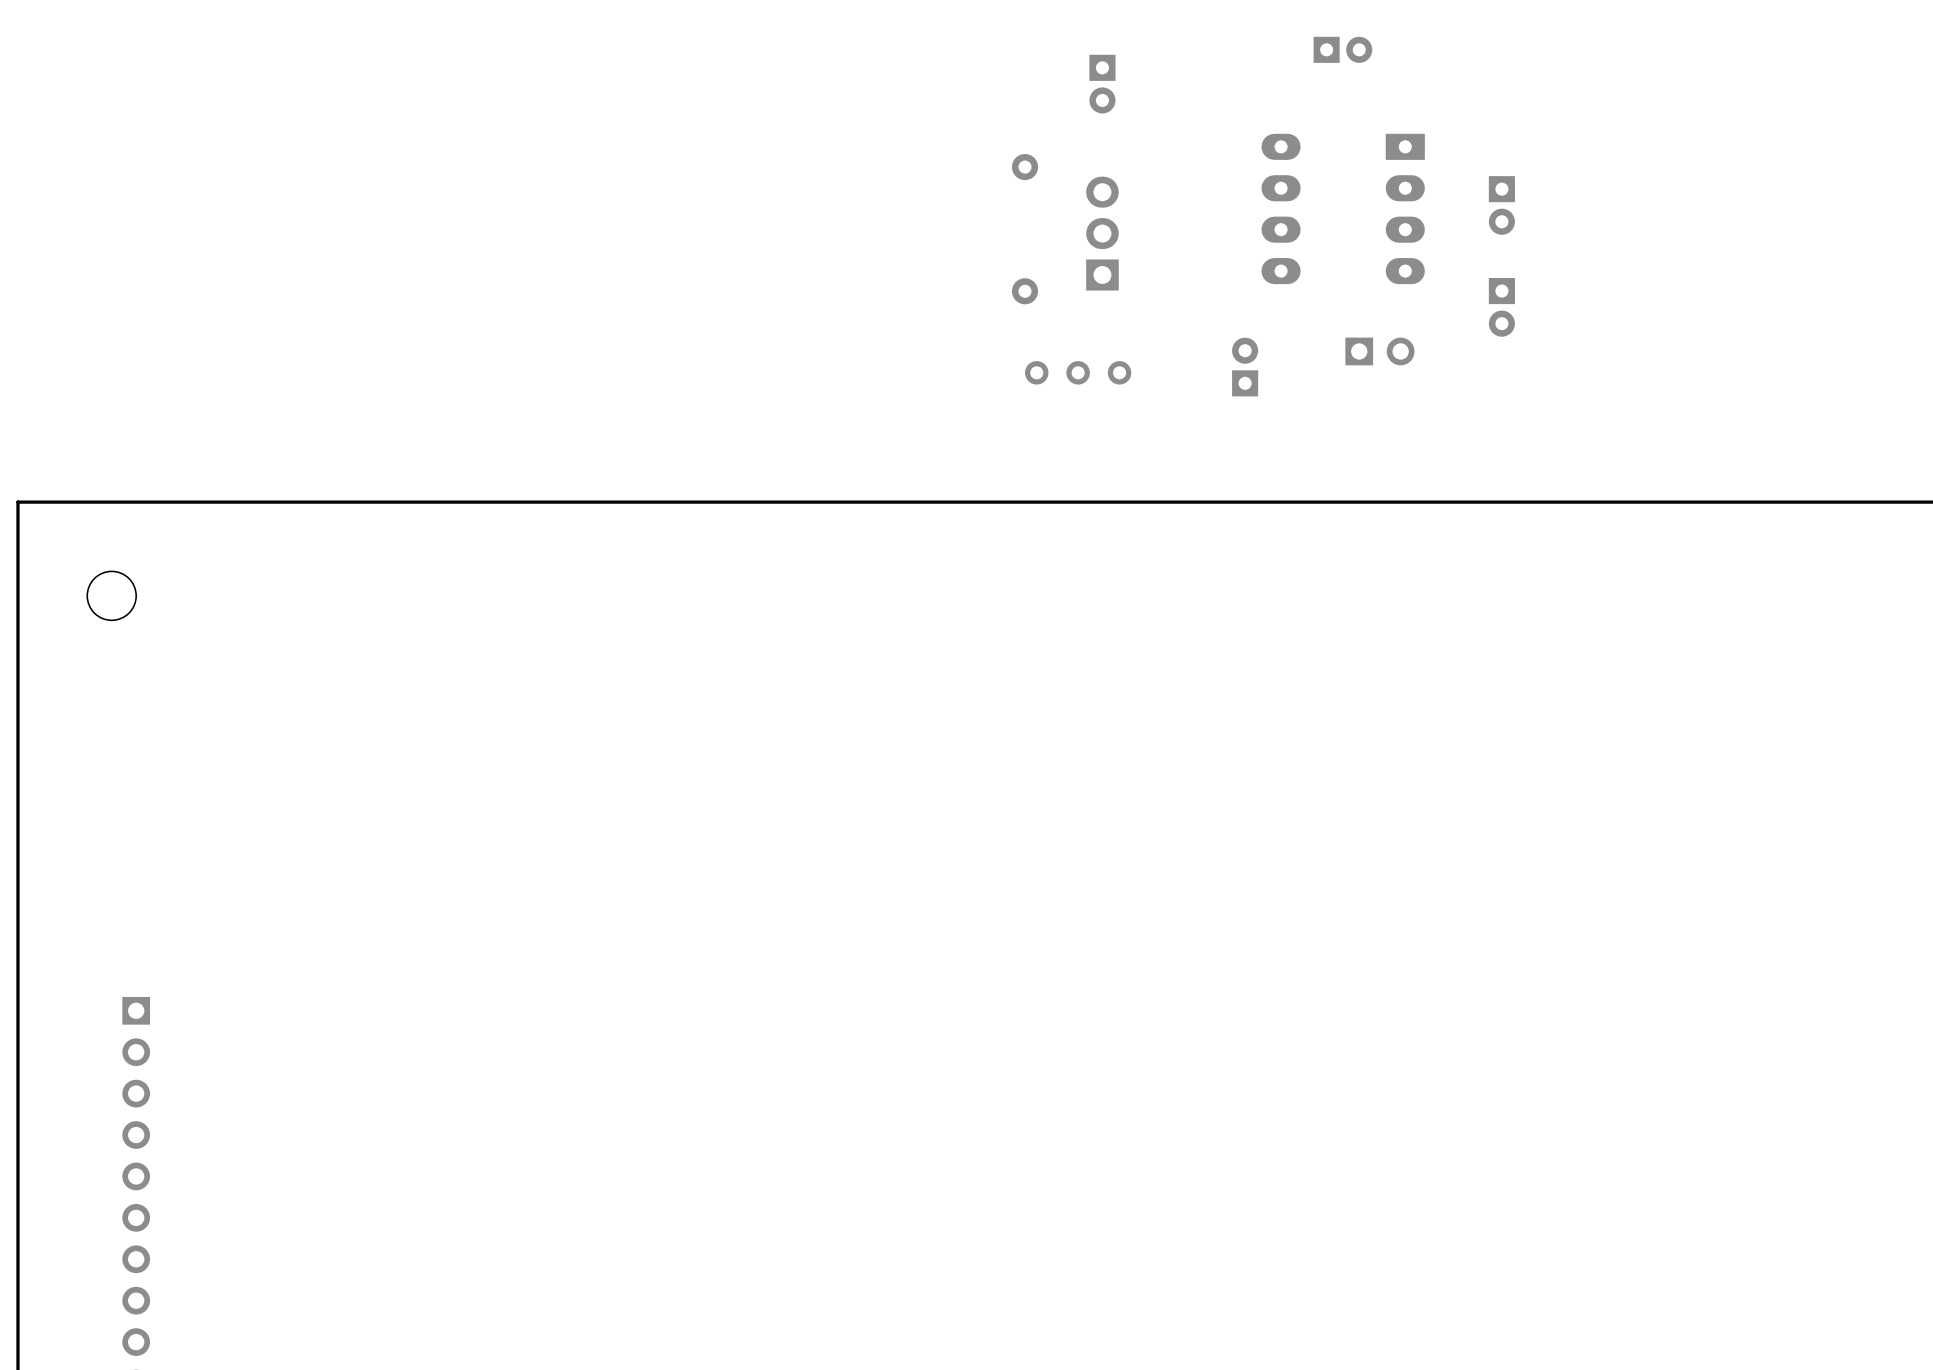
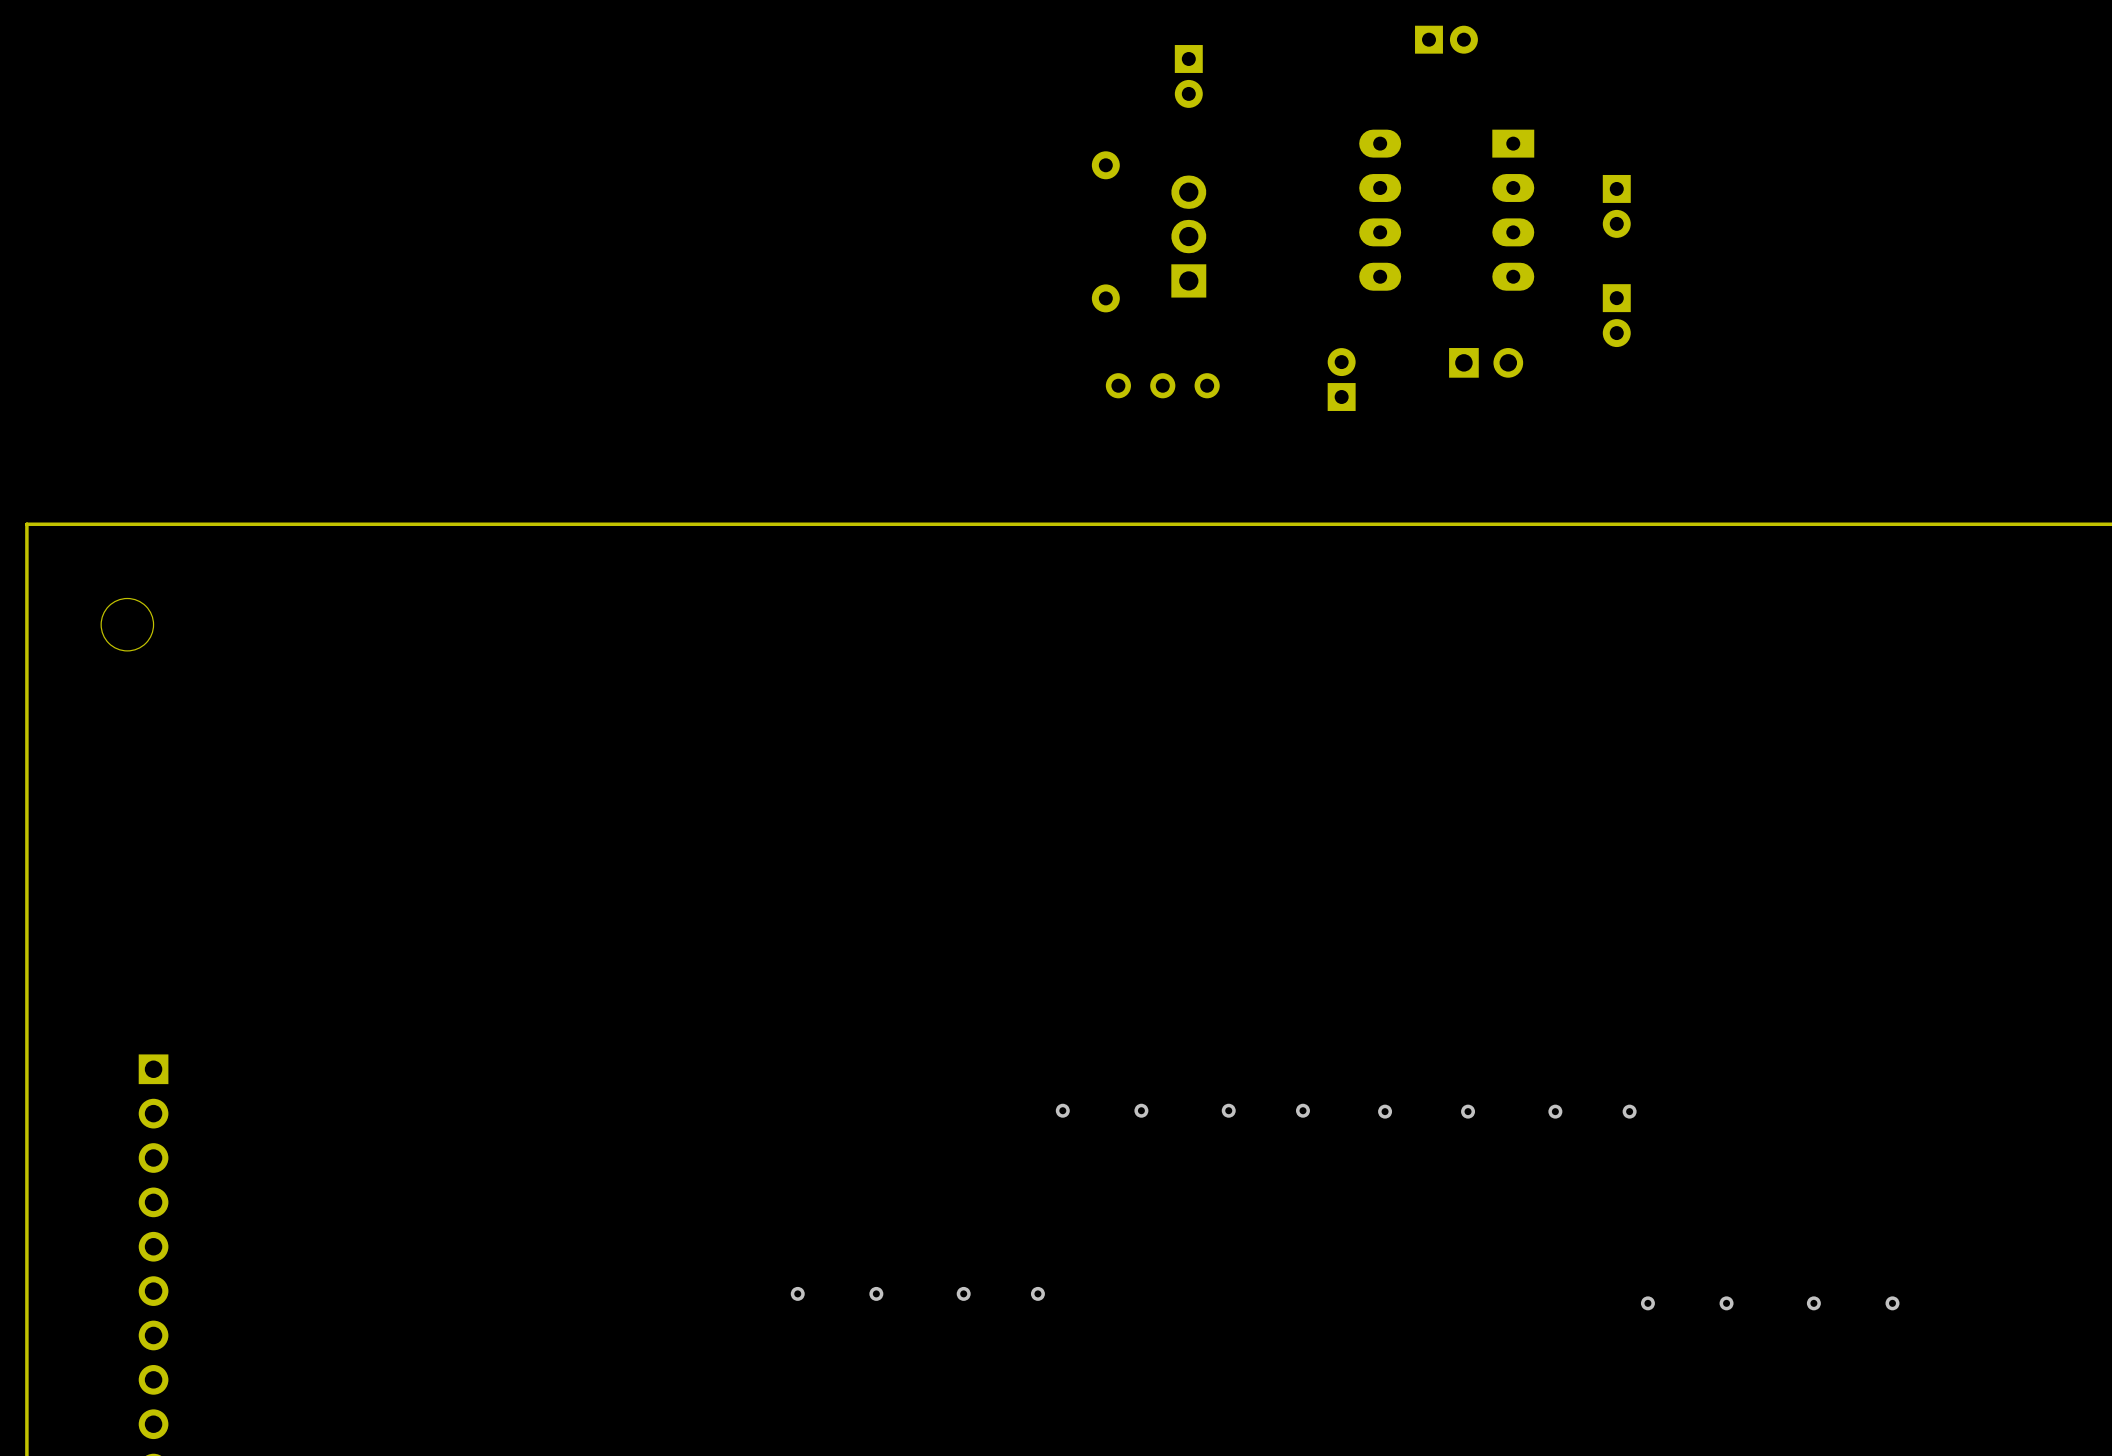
via: none -> (1062, 1110)
via: none -> (1141, 1110)
via: none -> (1228, 1110)
via: none -> (1302, 1110)
via: none -> (1385, 1111)
via: none -> (1468, 1111)
via: none -> (1555, 1111)
via: none -> (1629, 1111)
via: none -> (797, 1293)
via: none -> (876, 1293)
via: none -> (963, 1293)
via: none -> (1037, 1293)
via: none -> (1647, 1303)
via: none -> (1726, 1303)
via: none -> (1813, 1303)
via: none -> (1892, 1303)

